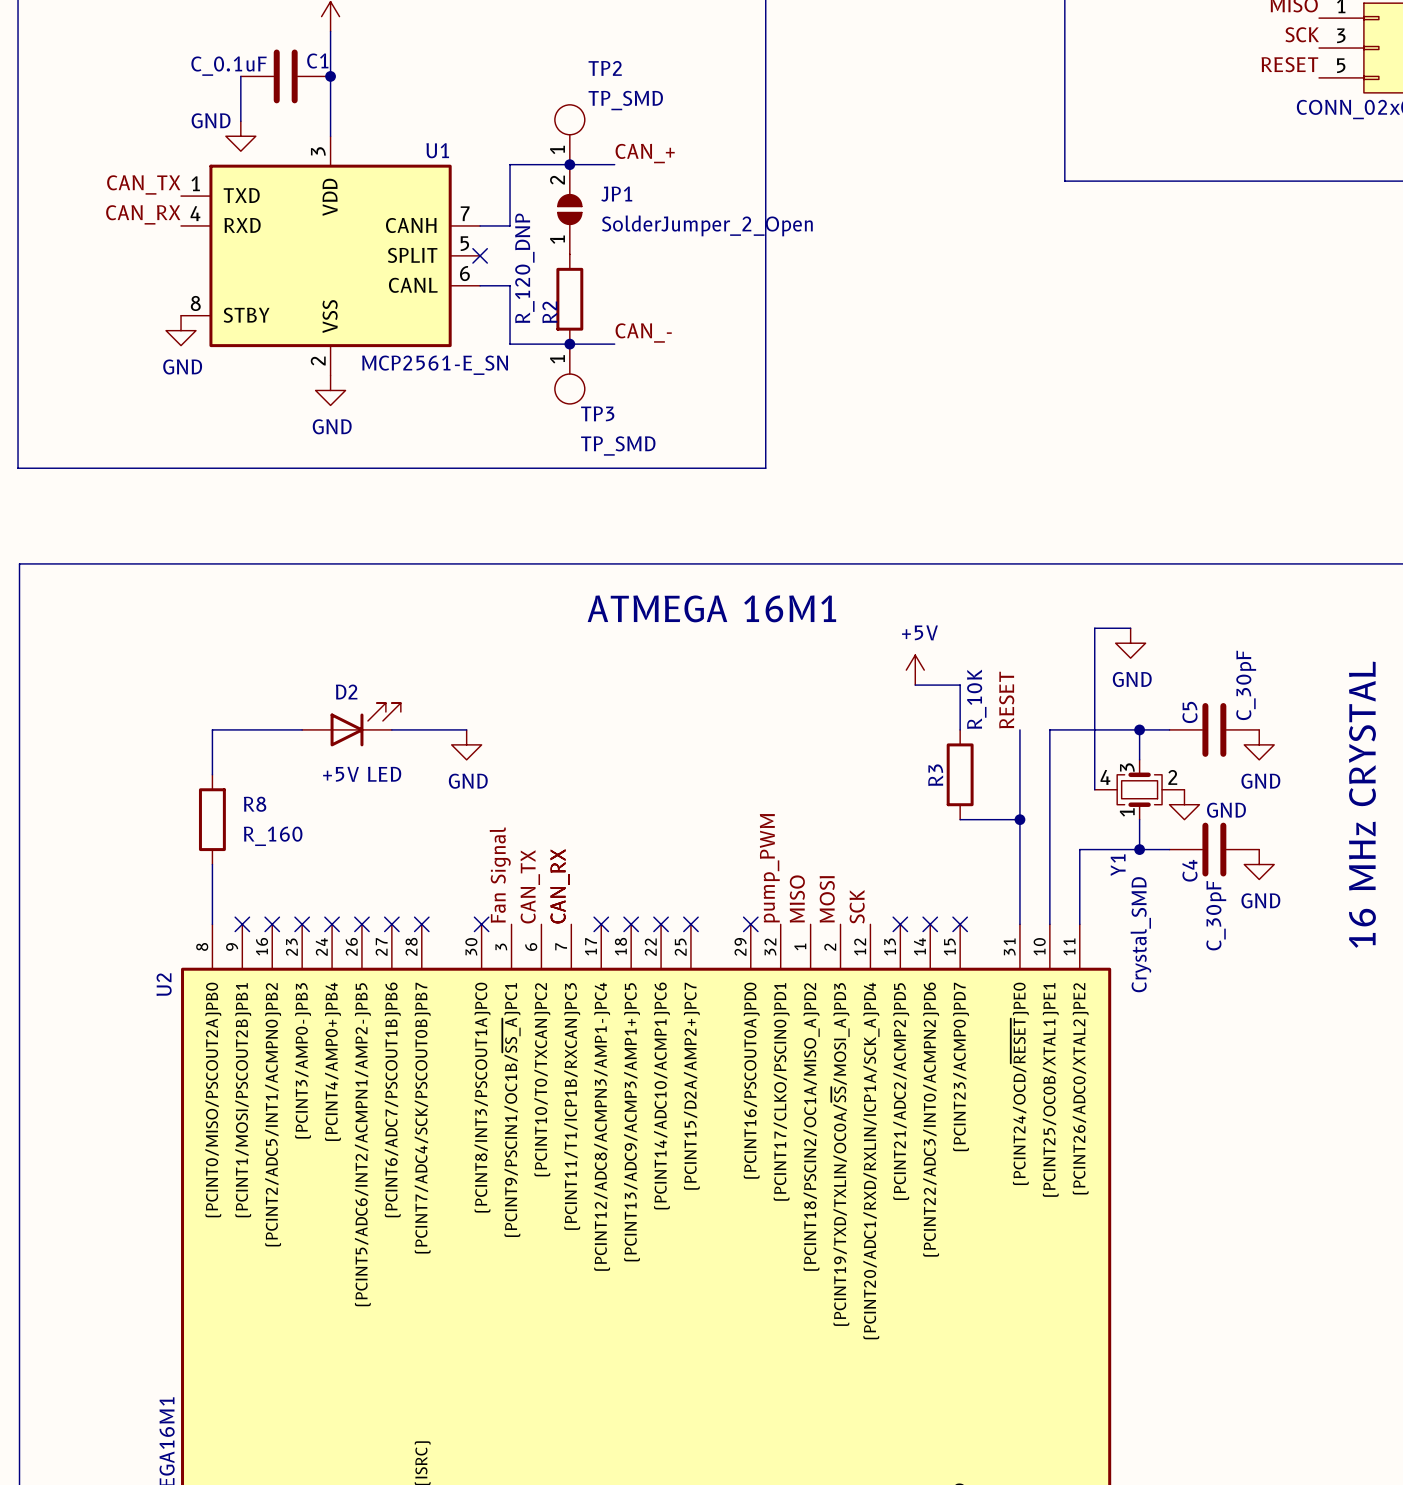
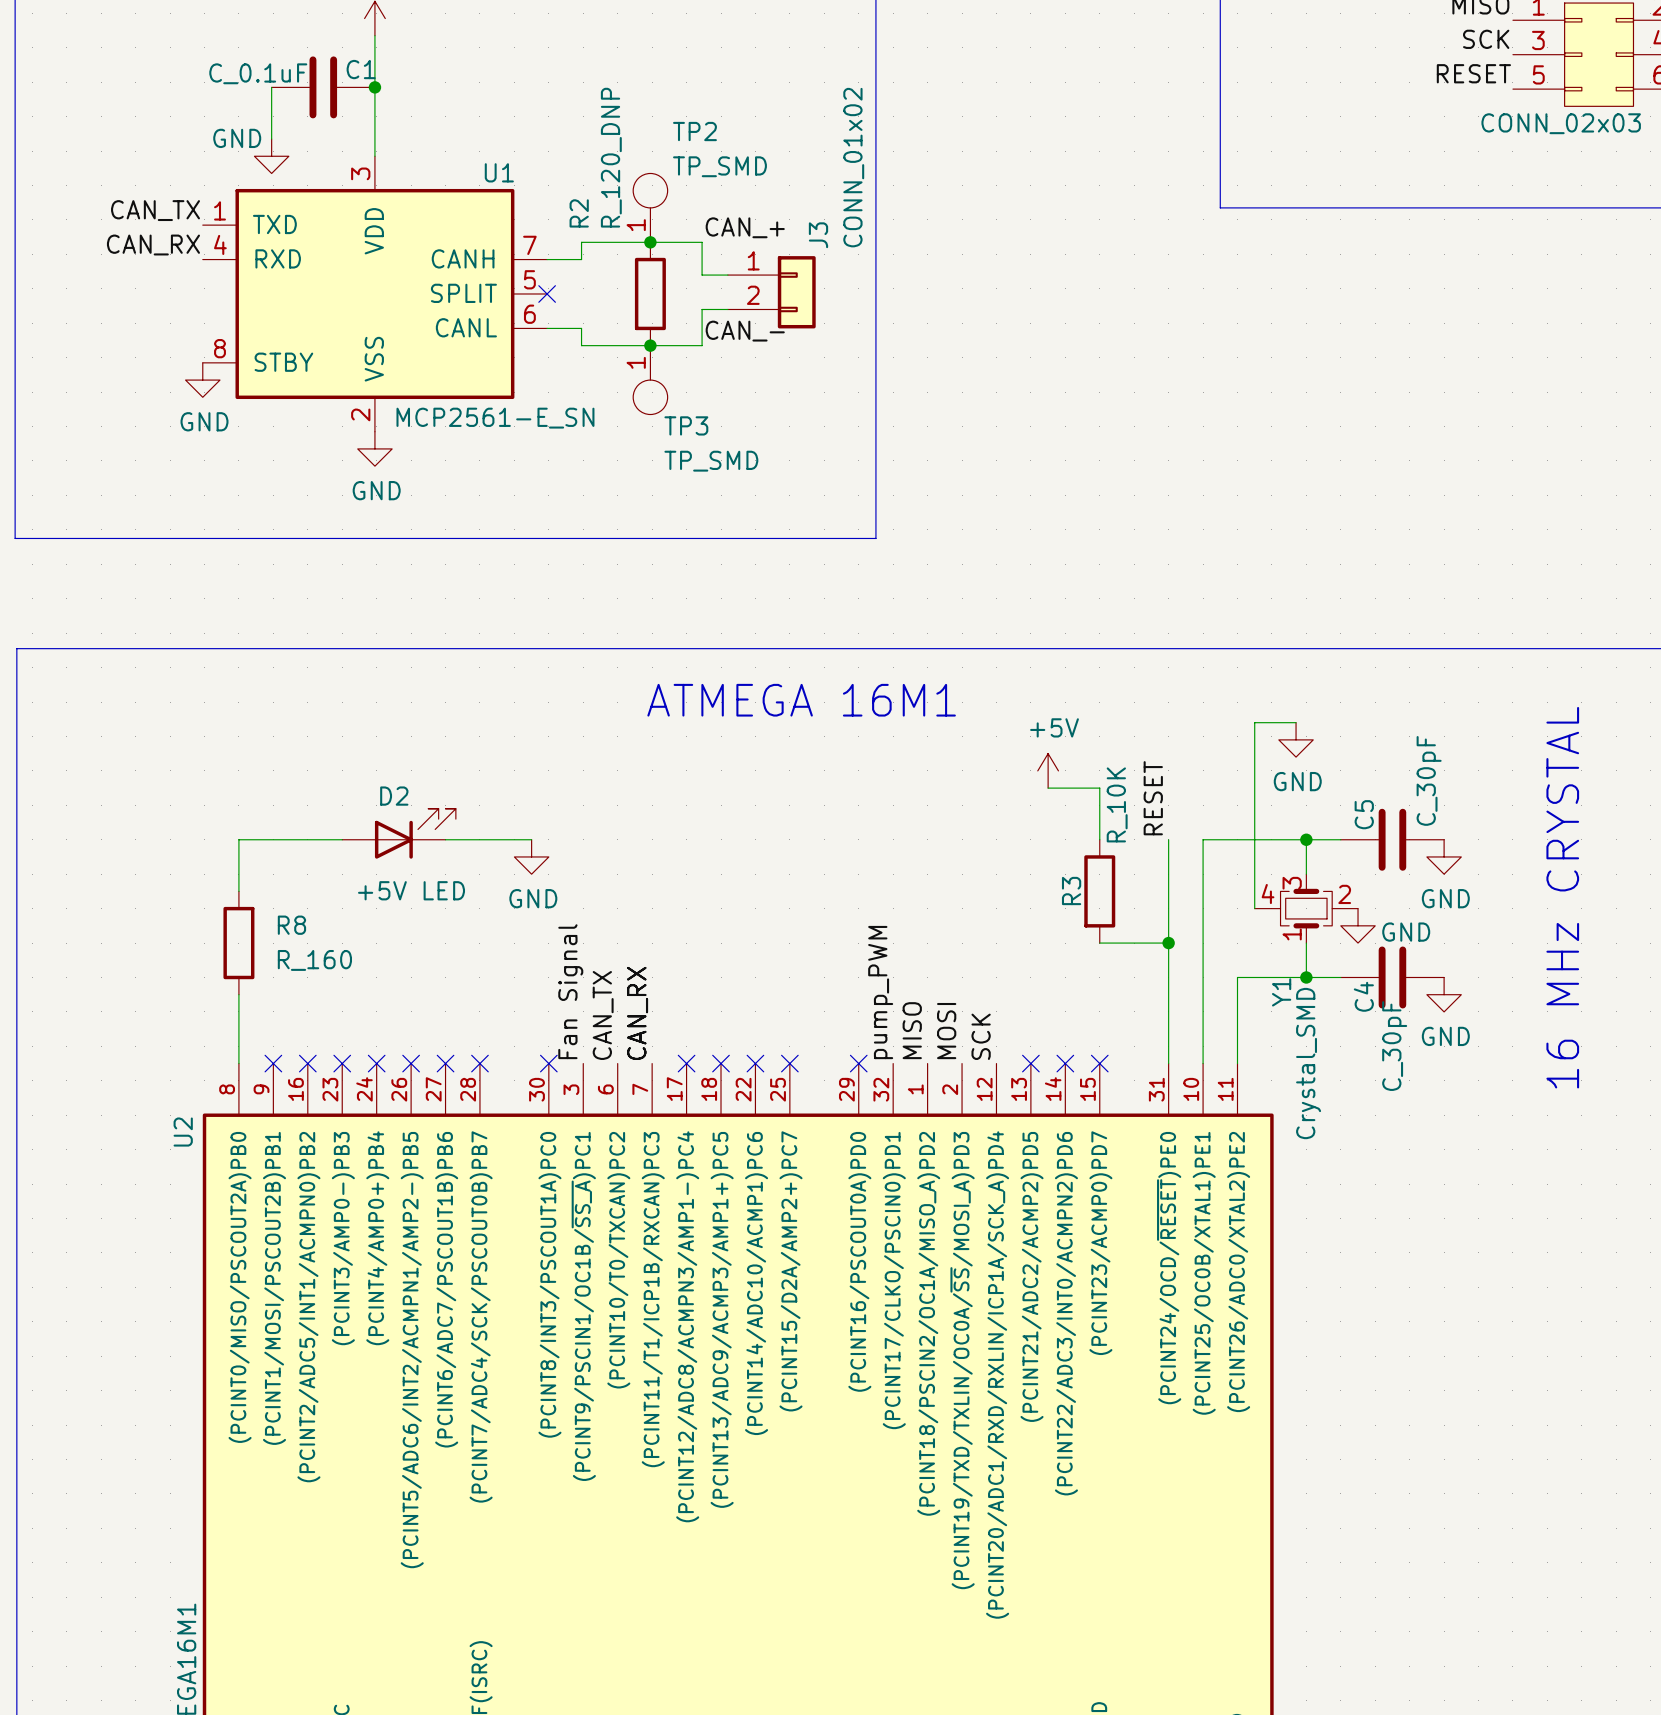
TP2 position: (569, 134) -> (650, 207)
label position: CAN_+ (645, 153) -> CAN_+ (745, 227)
junction position: (569, 164) -> (650, 242)
wire: (614, 164) (510, 164) (510, 211) -> (727, 275) (702, 275) (702, 242) (581, 242)
JP1: SolderJumper_2_Open (569, 209) -> none
J3: none -> CONN_01x02 (771, 292)
R2 value position: R_120_DNP (524, 268) -> R_120_DNP (611, 157)
R2 position: (569, 299) -> (650, 293)
wire: (510, 300) (510, 344) (614, 344) -> (581, 345) (702, 345) (702, 309) (727, 309)
R2 name position: R2 (549, 312) -> R2 (579, 213)
label position: CAN_- (643, 333) -> CAN_- (745, 331)
junction position: (569, 344) -> (650, 345)
TP3 position: (569, 374) -> (650, 380)

